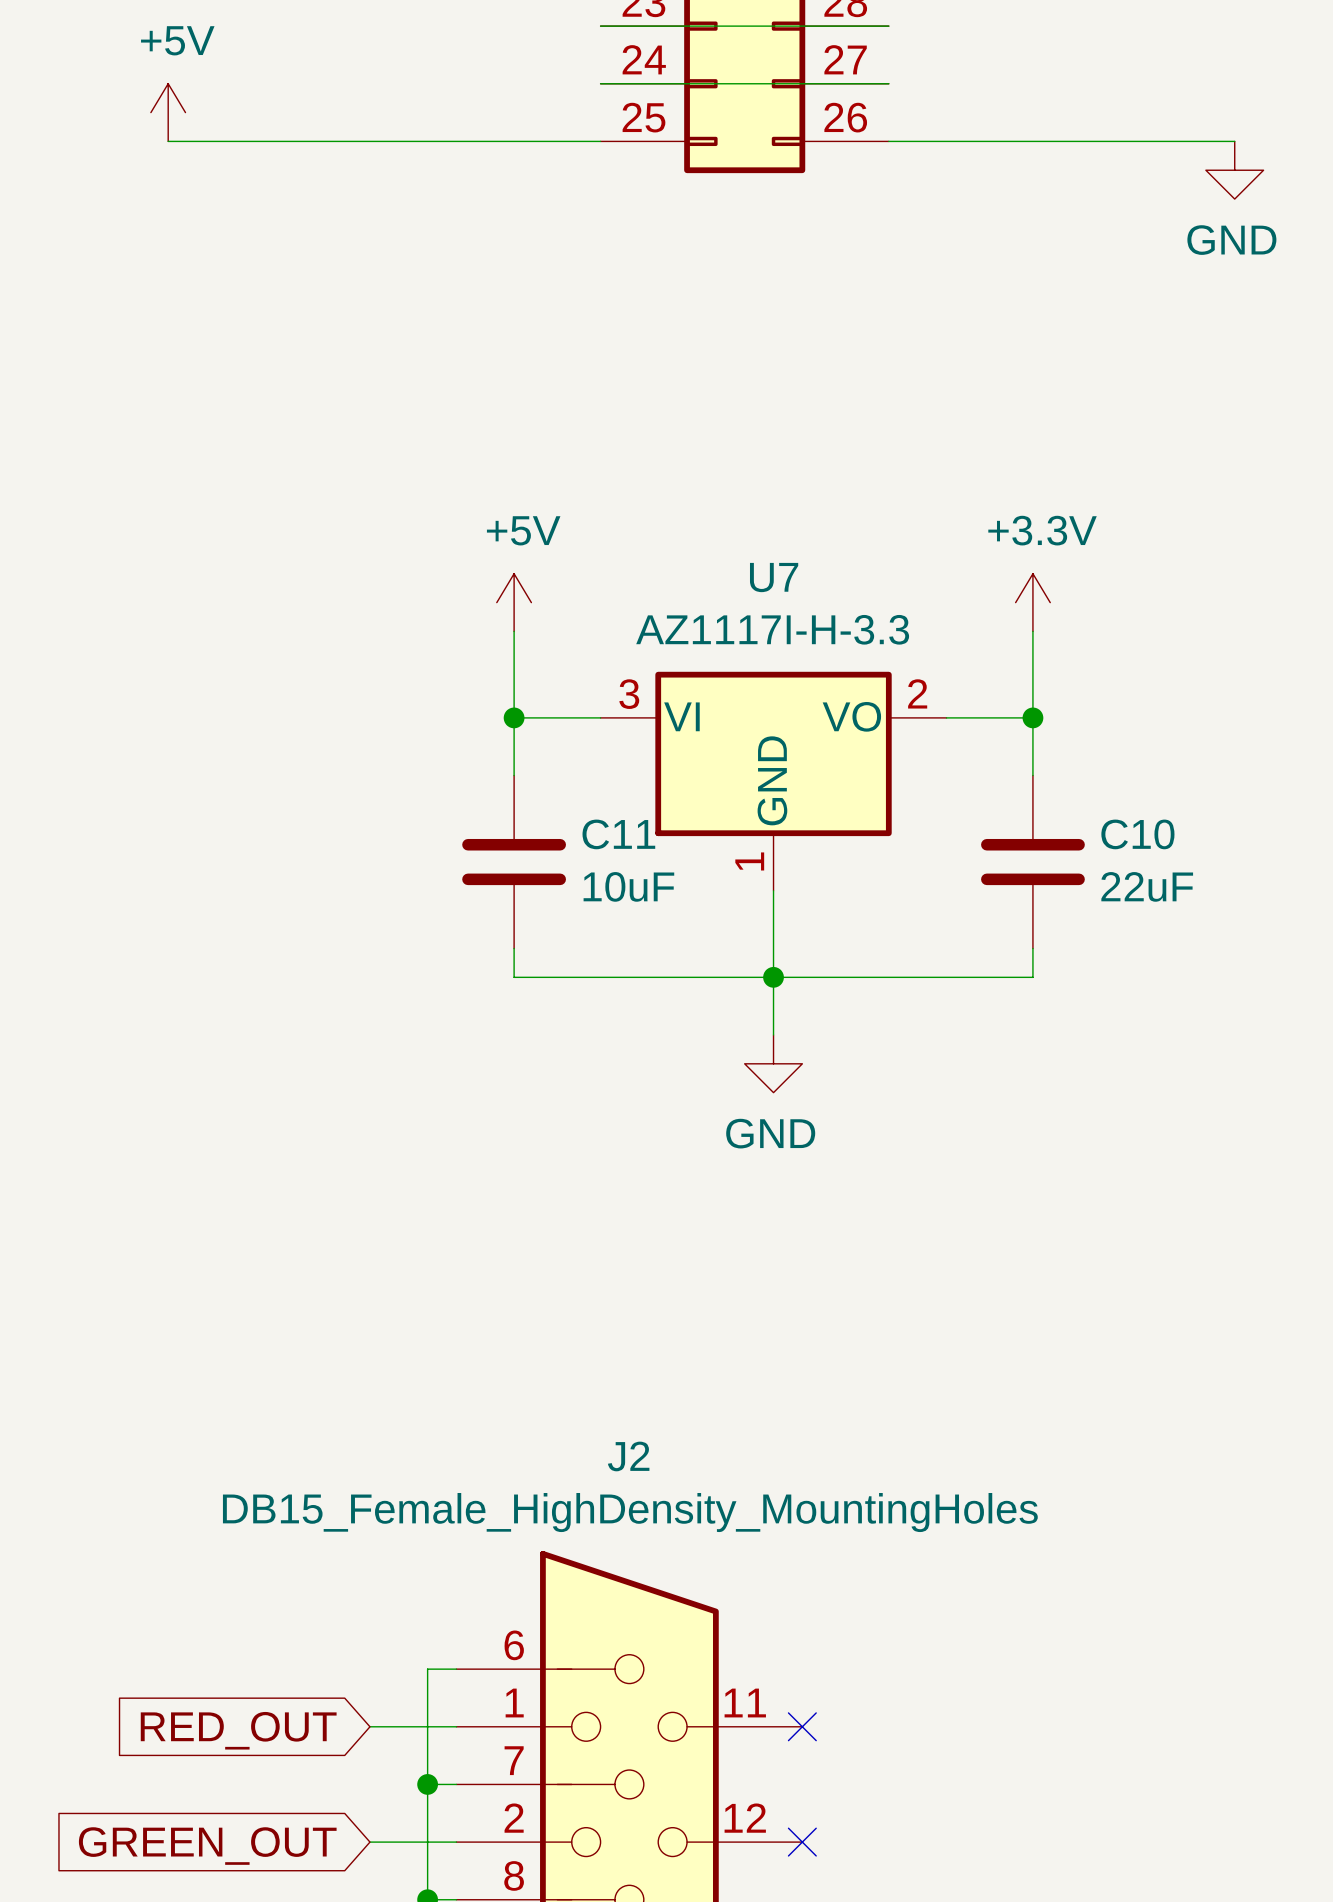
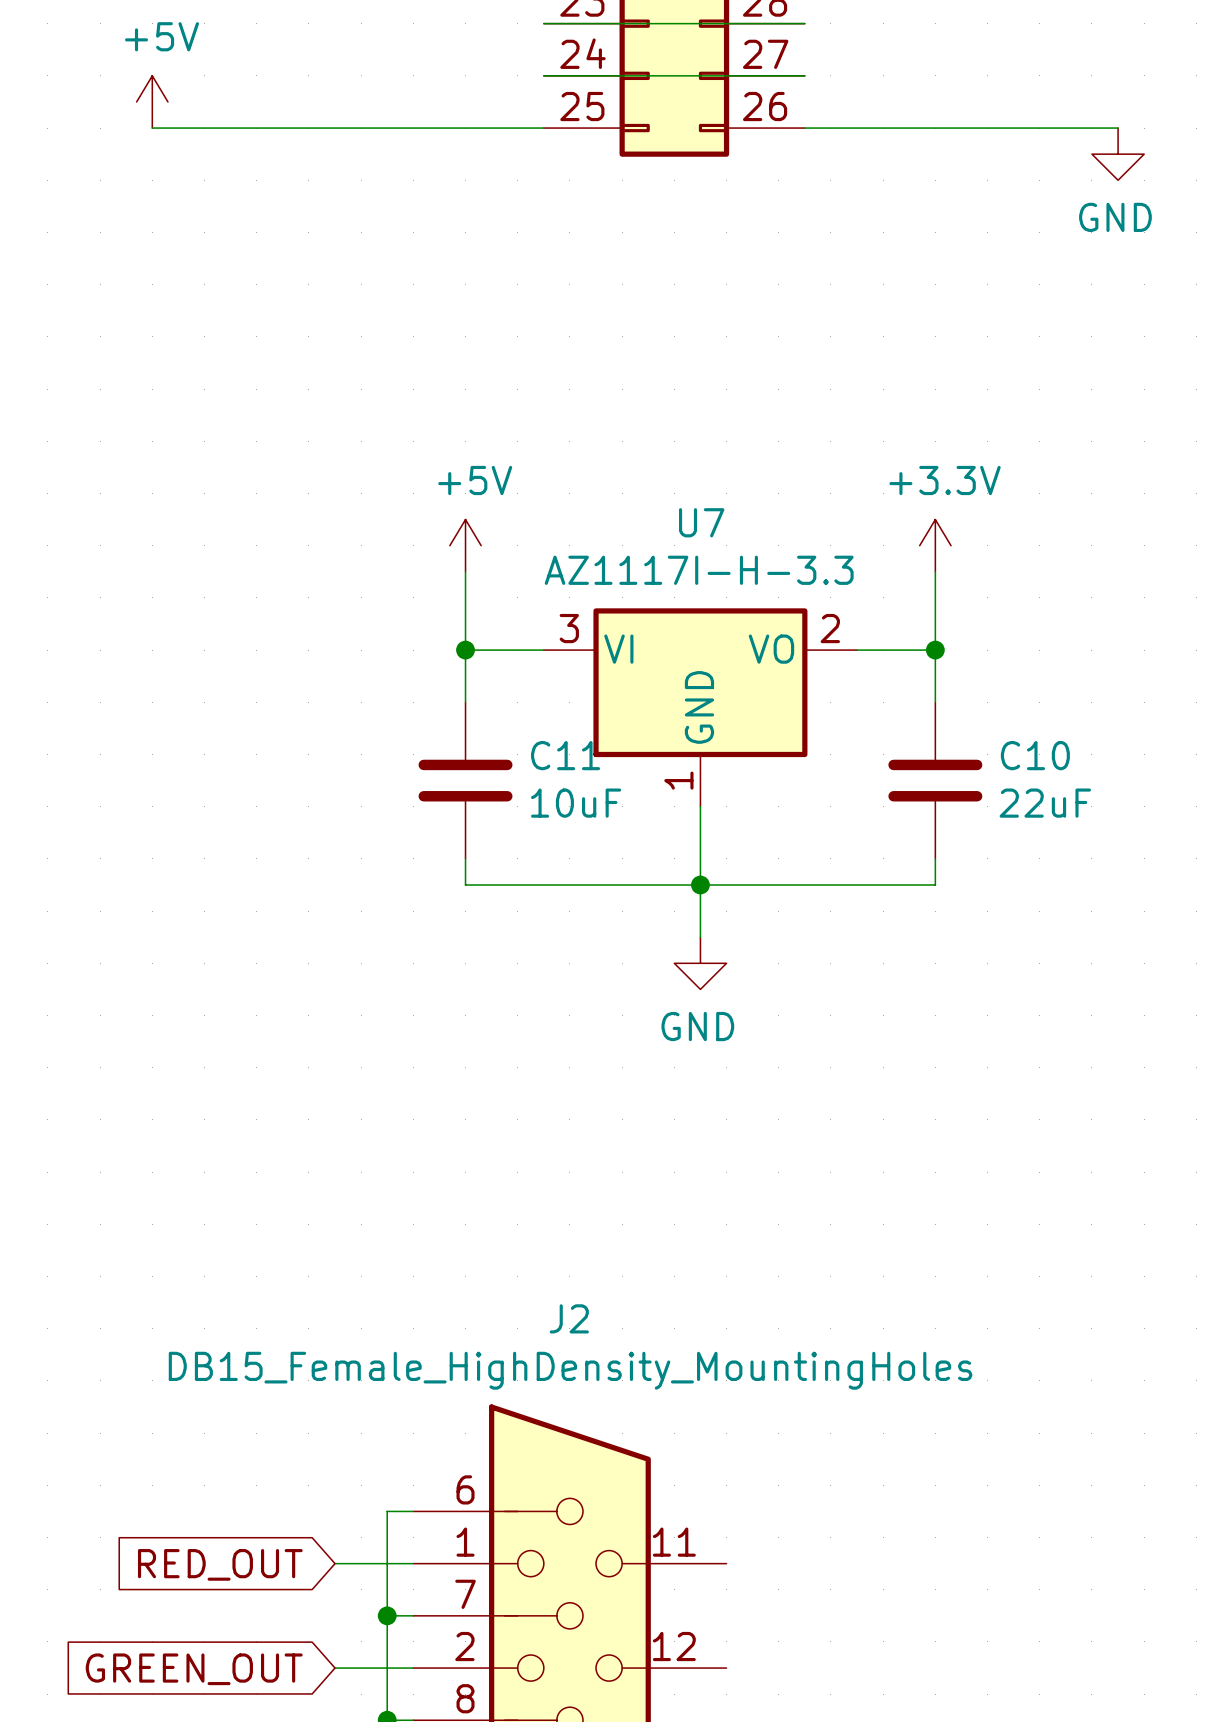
no-connect mark: (802, 1726) -> none
no-connect mark: (802, 1842) -> none

